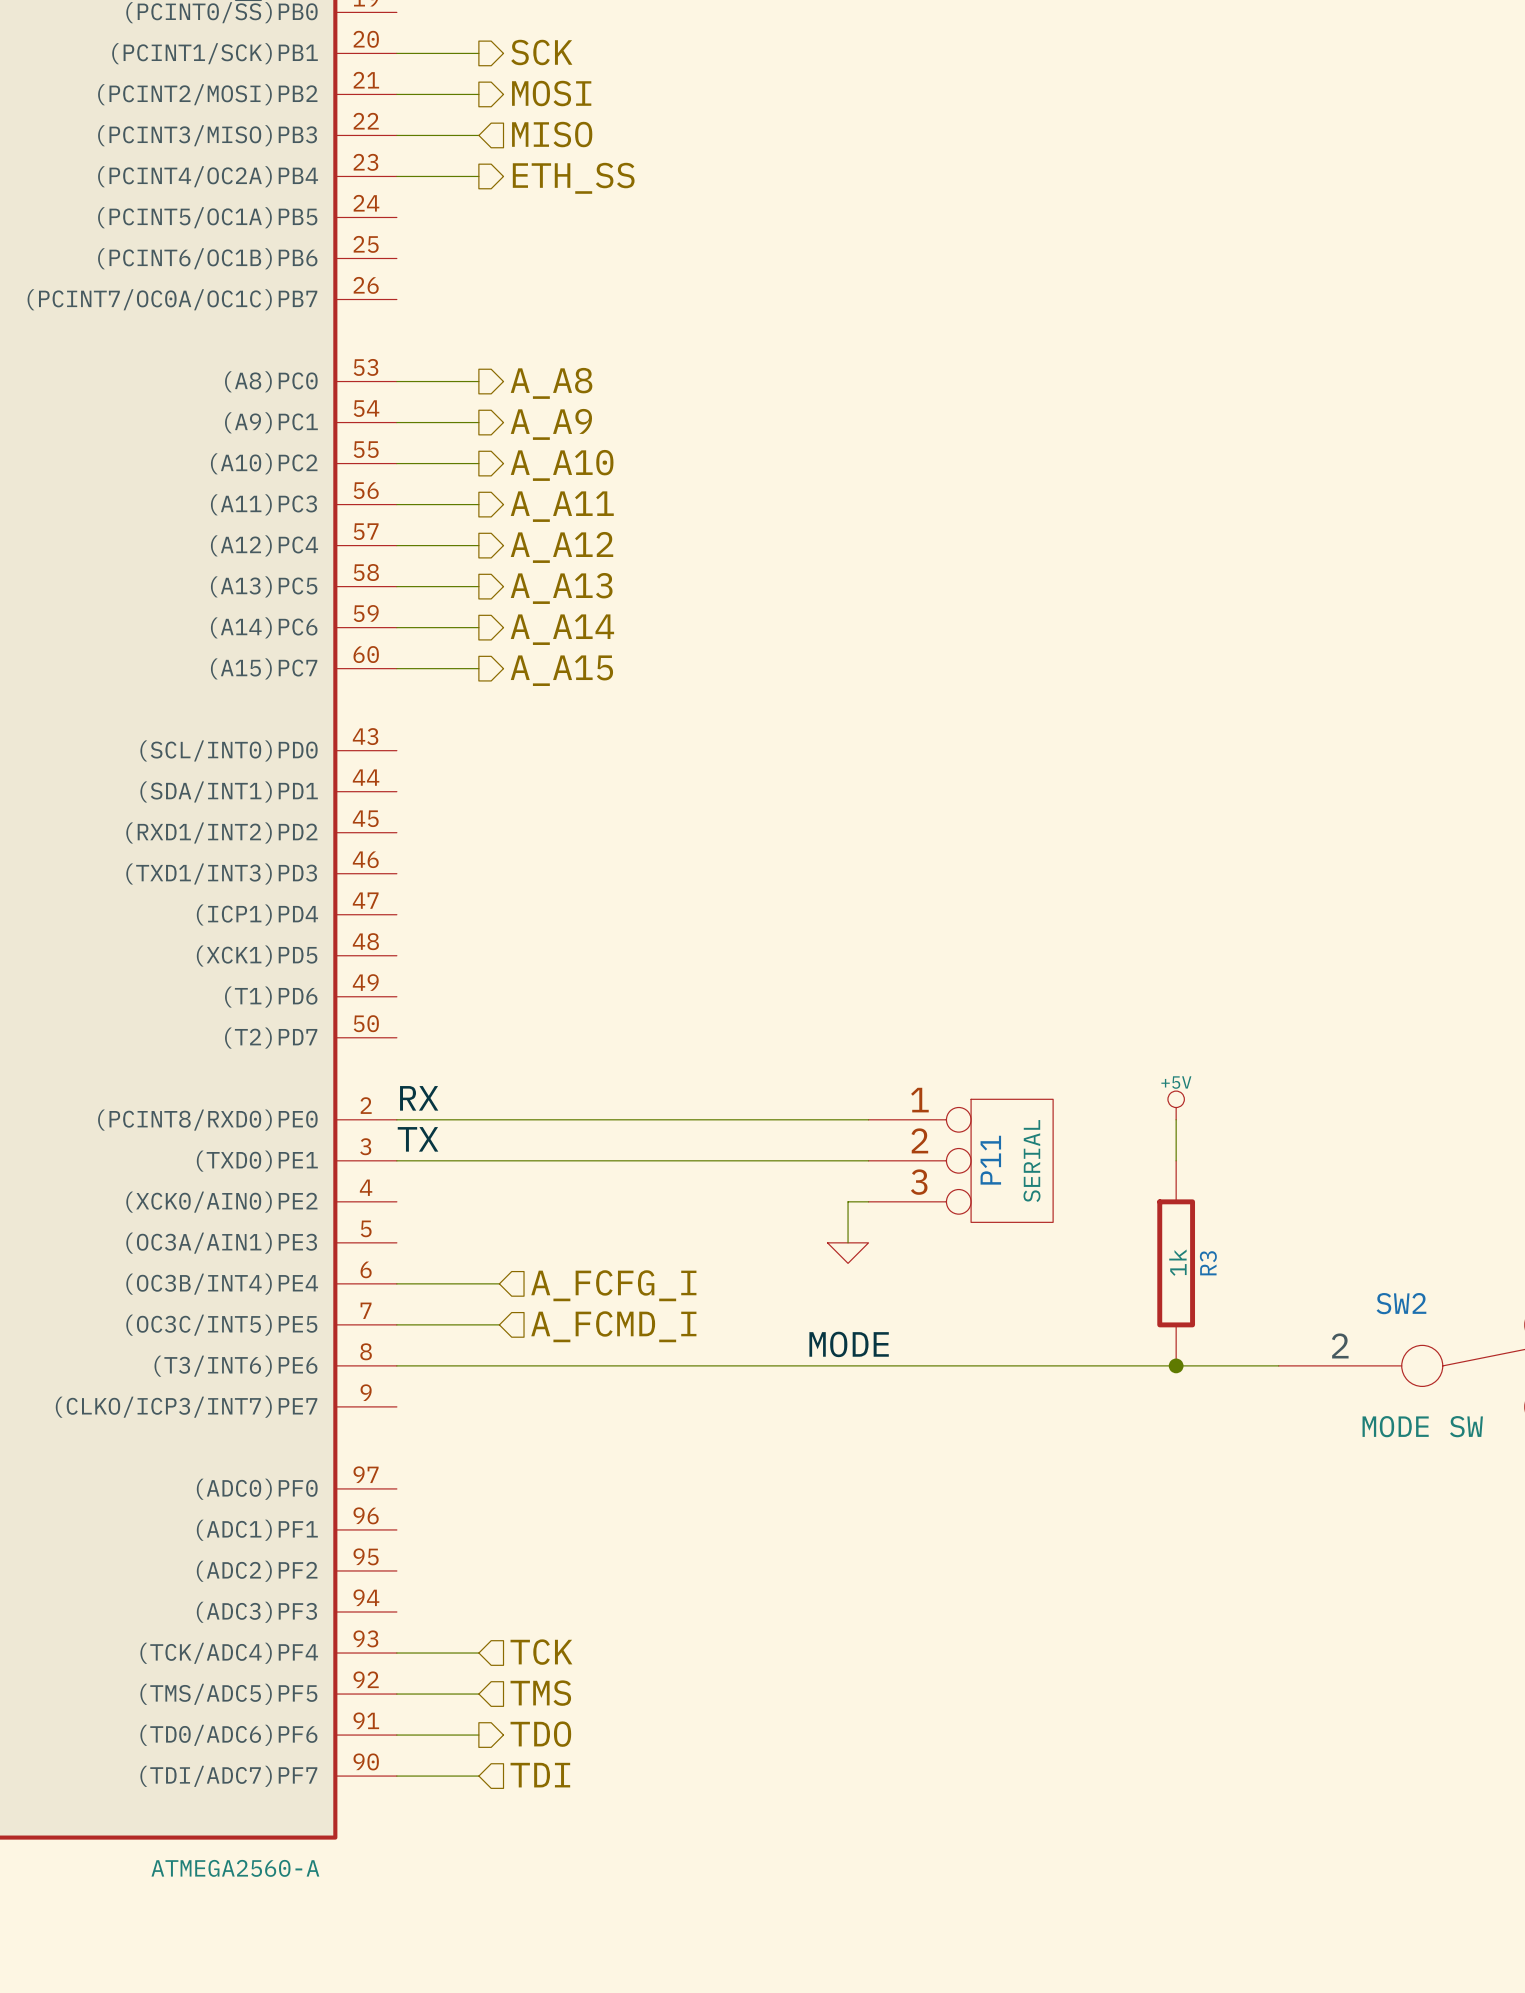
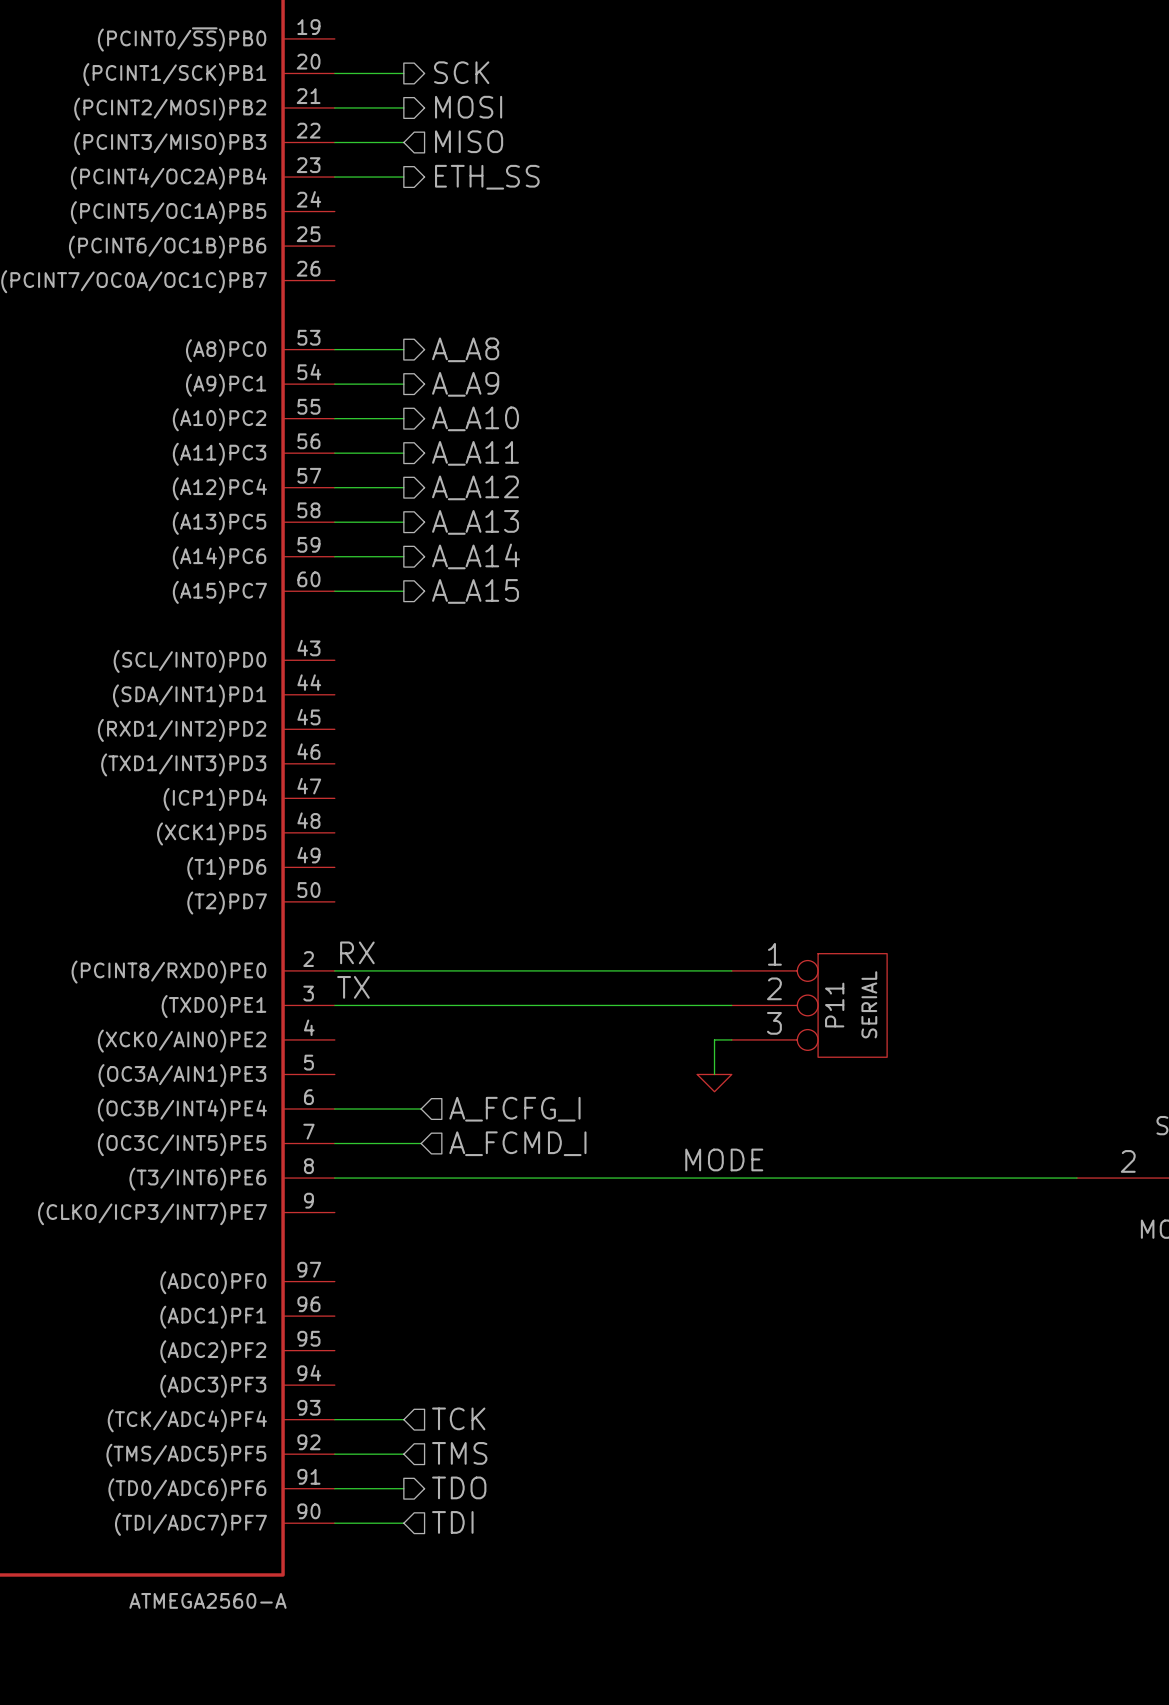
power symbol: +5V (1176, 1105) -> none
wire: (1176, 1119) (1176, 1160) -> none
R3: 1k (1176, 1263) -> none
junction: (1176, 1365) -> none

